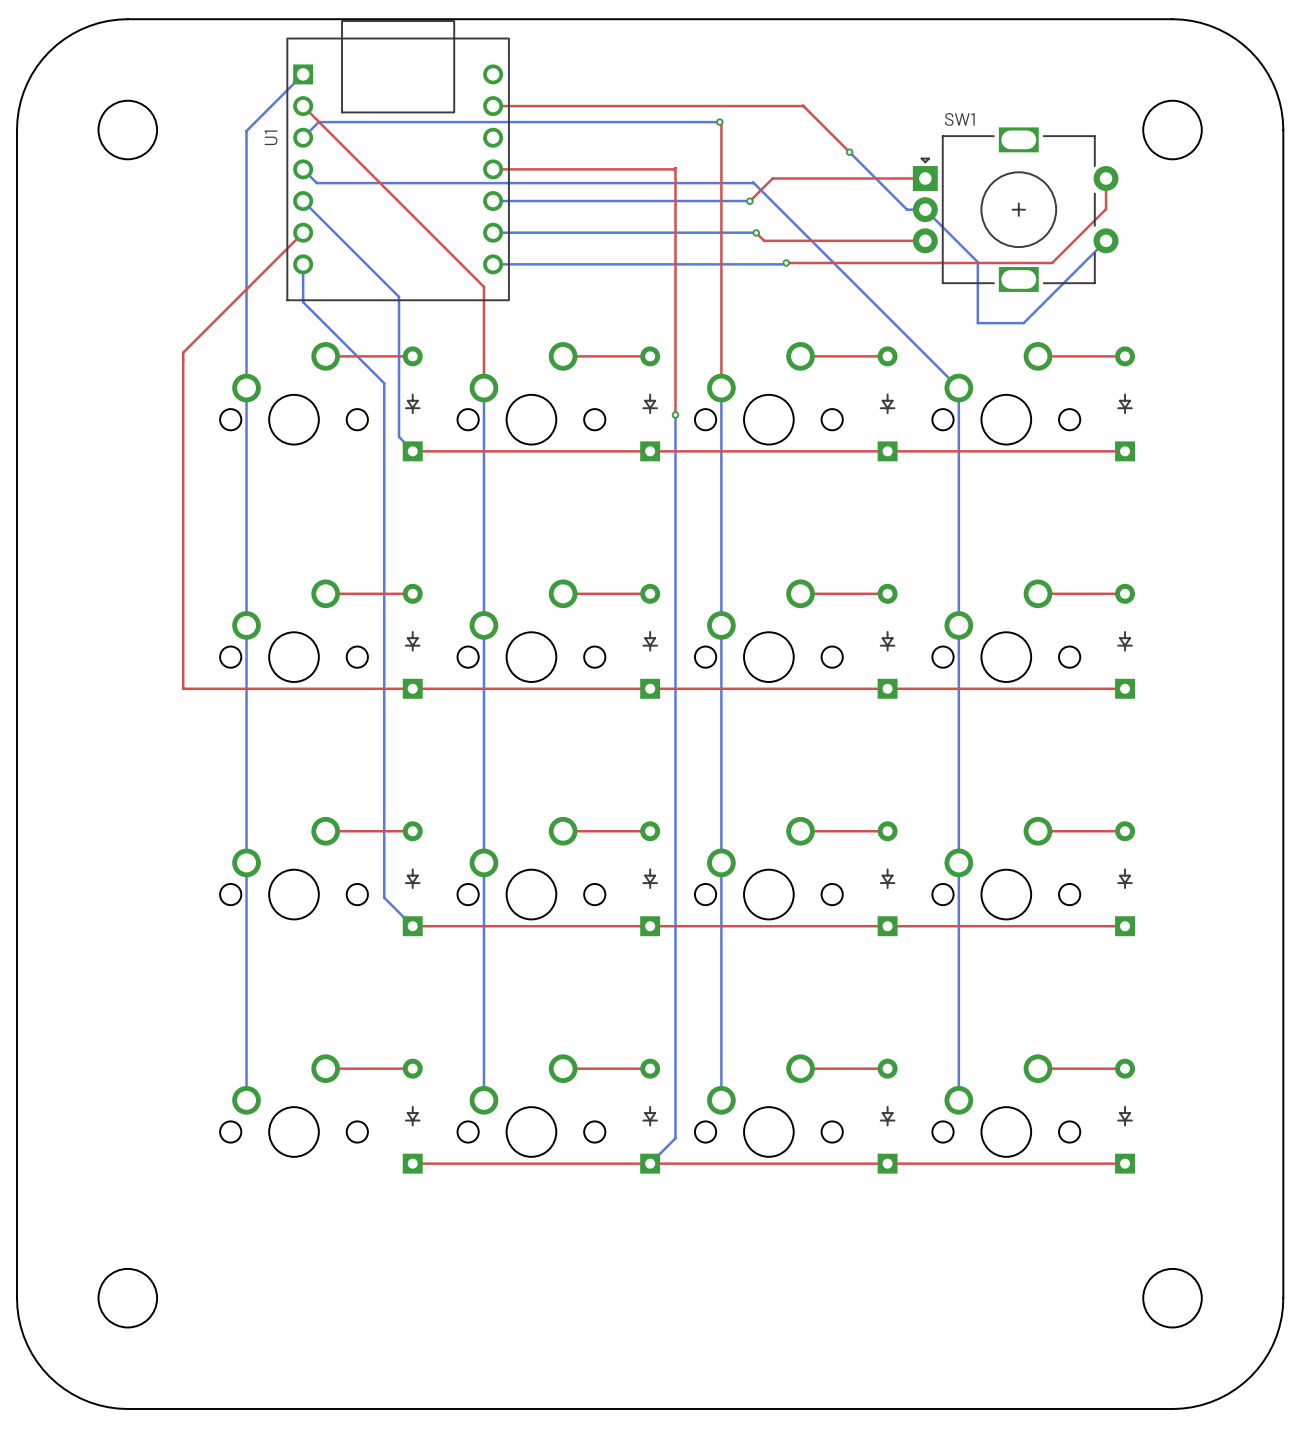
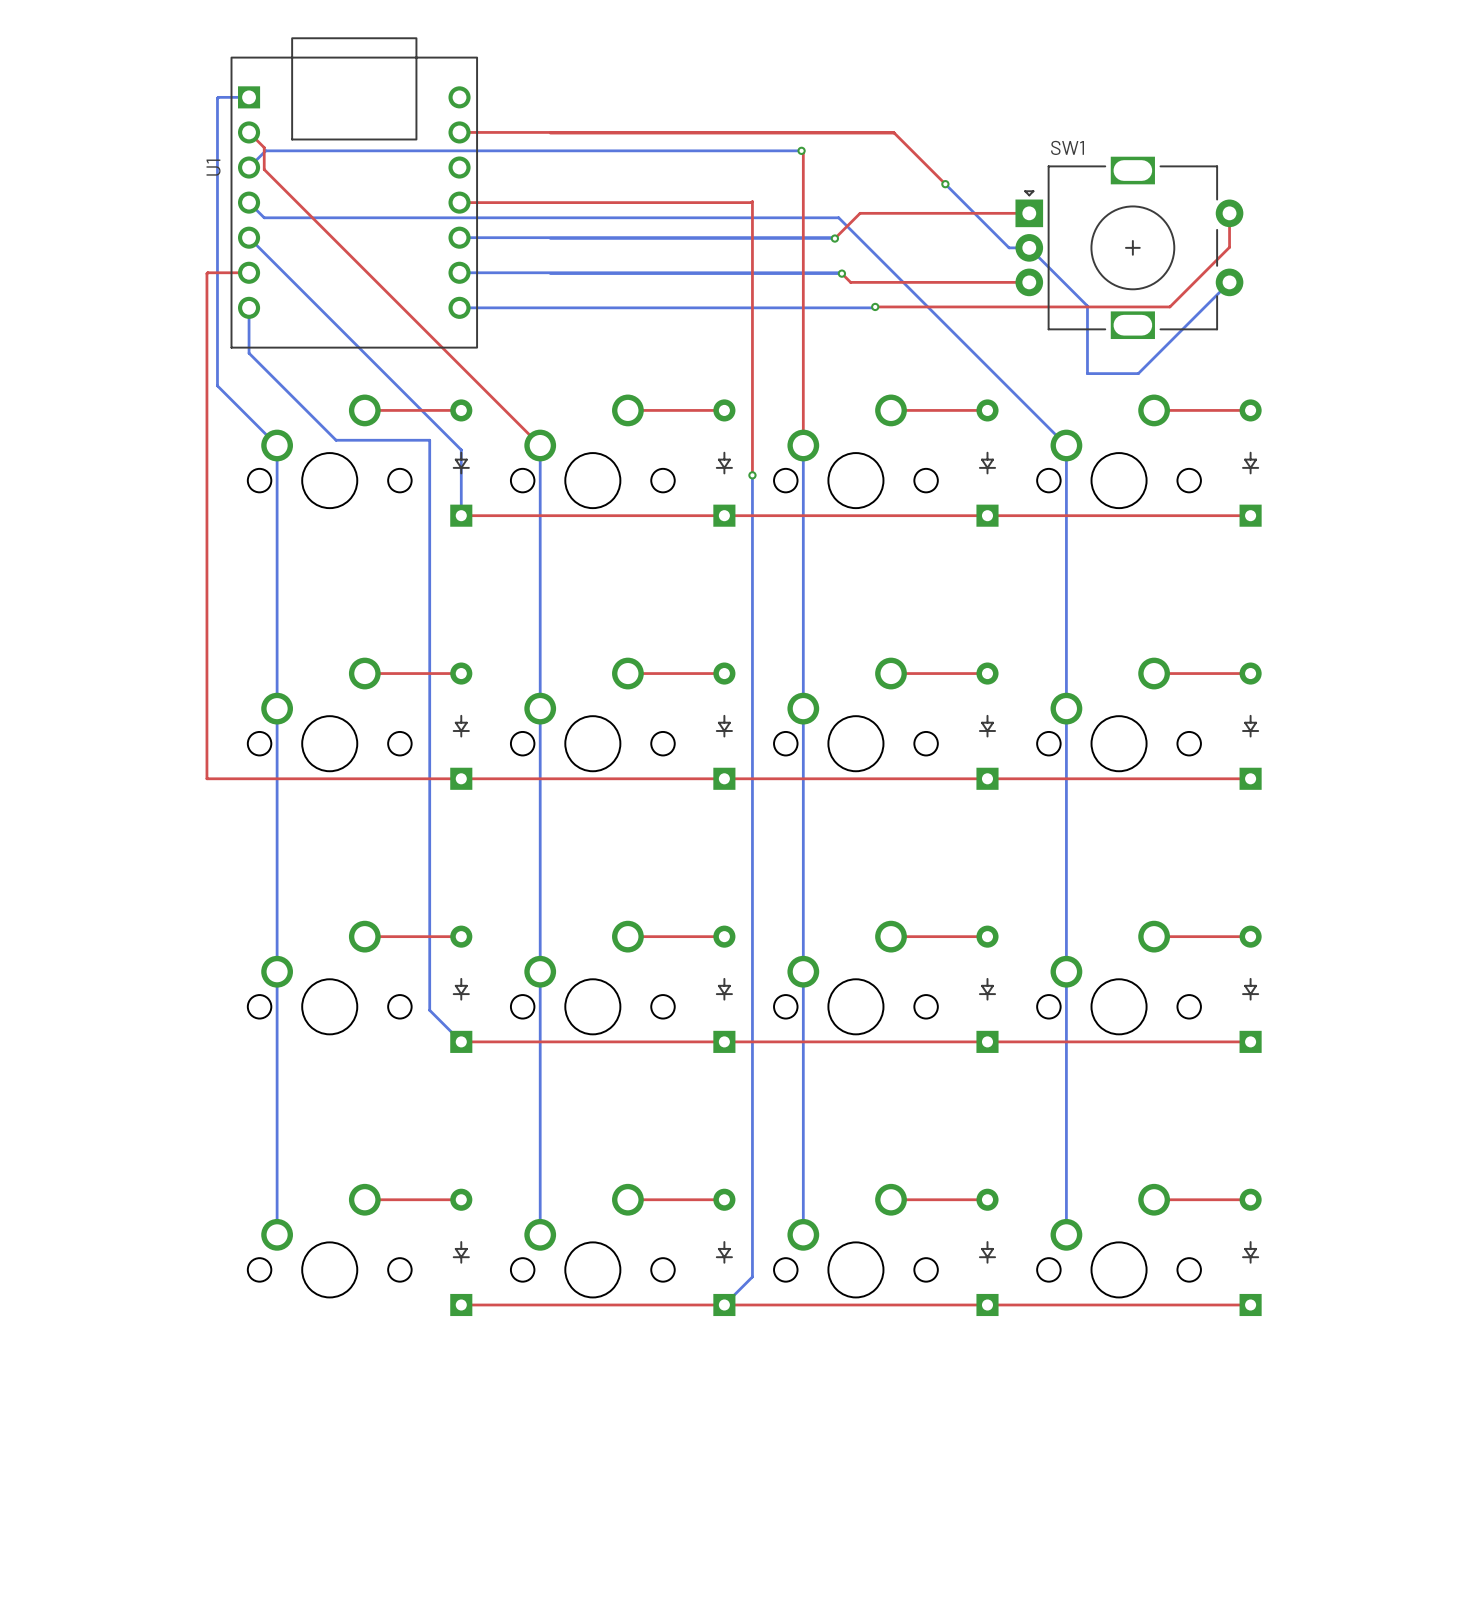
board edge: (127, 19) (1172, 19) (1201, 22) (1219, 29) (1236, 39) (1257, 58) (1268, 74) (1276, 92) (1281, 110) (1283, 130) (1283, 1298) (1279, 1326) (1272, 1345) (1263, 1361) (1243, 1383) (1227, 1394) (1210, 1402) (1191, 1407) (1172, 1409) (127, 1409) (99, 1405) (80, 1398) (64, 1388) (42, 1369) (31, 1353) (23, 1336) (18, 1317) (17, 1298) (17, 120) (20, 101) (27, 83) (37, 66) (49, 51) (64, 39) (89, 25) (108, 20) (127, 19) -> none
bottom track: (303, 74) (246, 131) (246, 388) -> (249, 97) (217, 98) (217, 385) (277, 445)
round board edge: [98, 100, 158, 160] -> none
round board edge: [1142, 100, 1203, 160] -> none
top track: none -> (459, 132) (893, 132)
top track: (303, 106) (483, 286) (483, 388) -> (249, 132) (264, 147) (264, 169) (540, 445)
bottom track: (318, 122) (303, 137) -> (357, 150) (265, 150) (249, 167)
U1 position: (398, 160) -> (354, 192)
top track: (674, 168) (493, 169) -> (751, 202) (459, 202)
bottom track: (303, 169) (316, 183) (753, 182) -> (249, 202) (264, 217) (838, 217)
bottom track: none -> (459, 237) (834, 237)
bottom track: (303, 201) (399, 296) (399, 436) (412, 450) -> (249, 237) (461, 449) (461, 514)
top track: (303, 232) (183, 352) -> (249, 272) (206, 273) (206, 406)
bottom track: none -> (459, 272) (841, 272)
bottom track: (785, 263) (493, 264) -> (874, 307) (459, 307)
bottom track: (303, 264) (303, 302) (384, 383) -> (249, 307) (249, 353) (336, 440) (429, 440)
round board edge: [98, 1268, 158, 1328] -> none
round board edge: [1142, 1268, 1203, 1328] -> none

